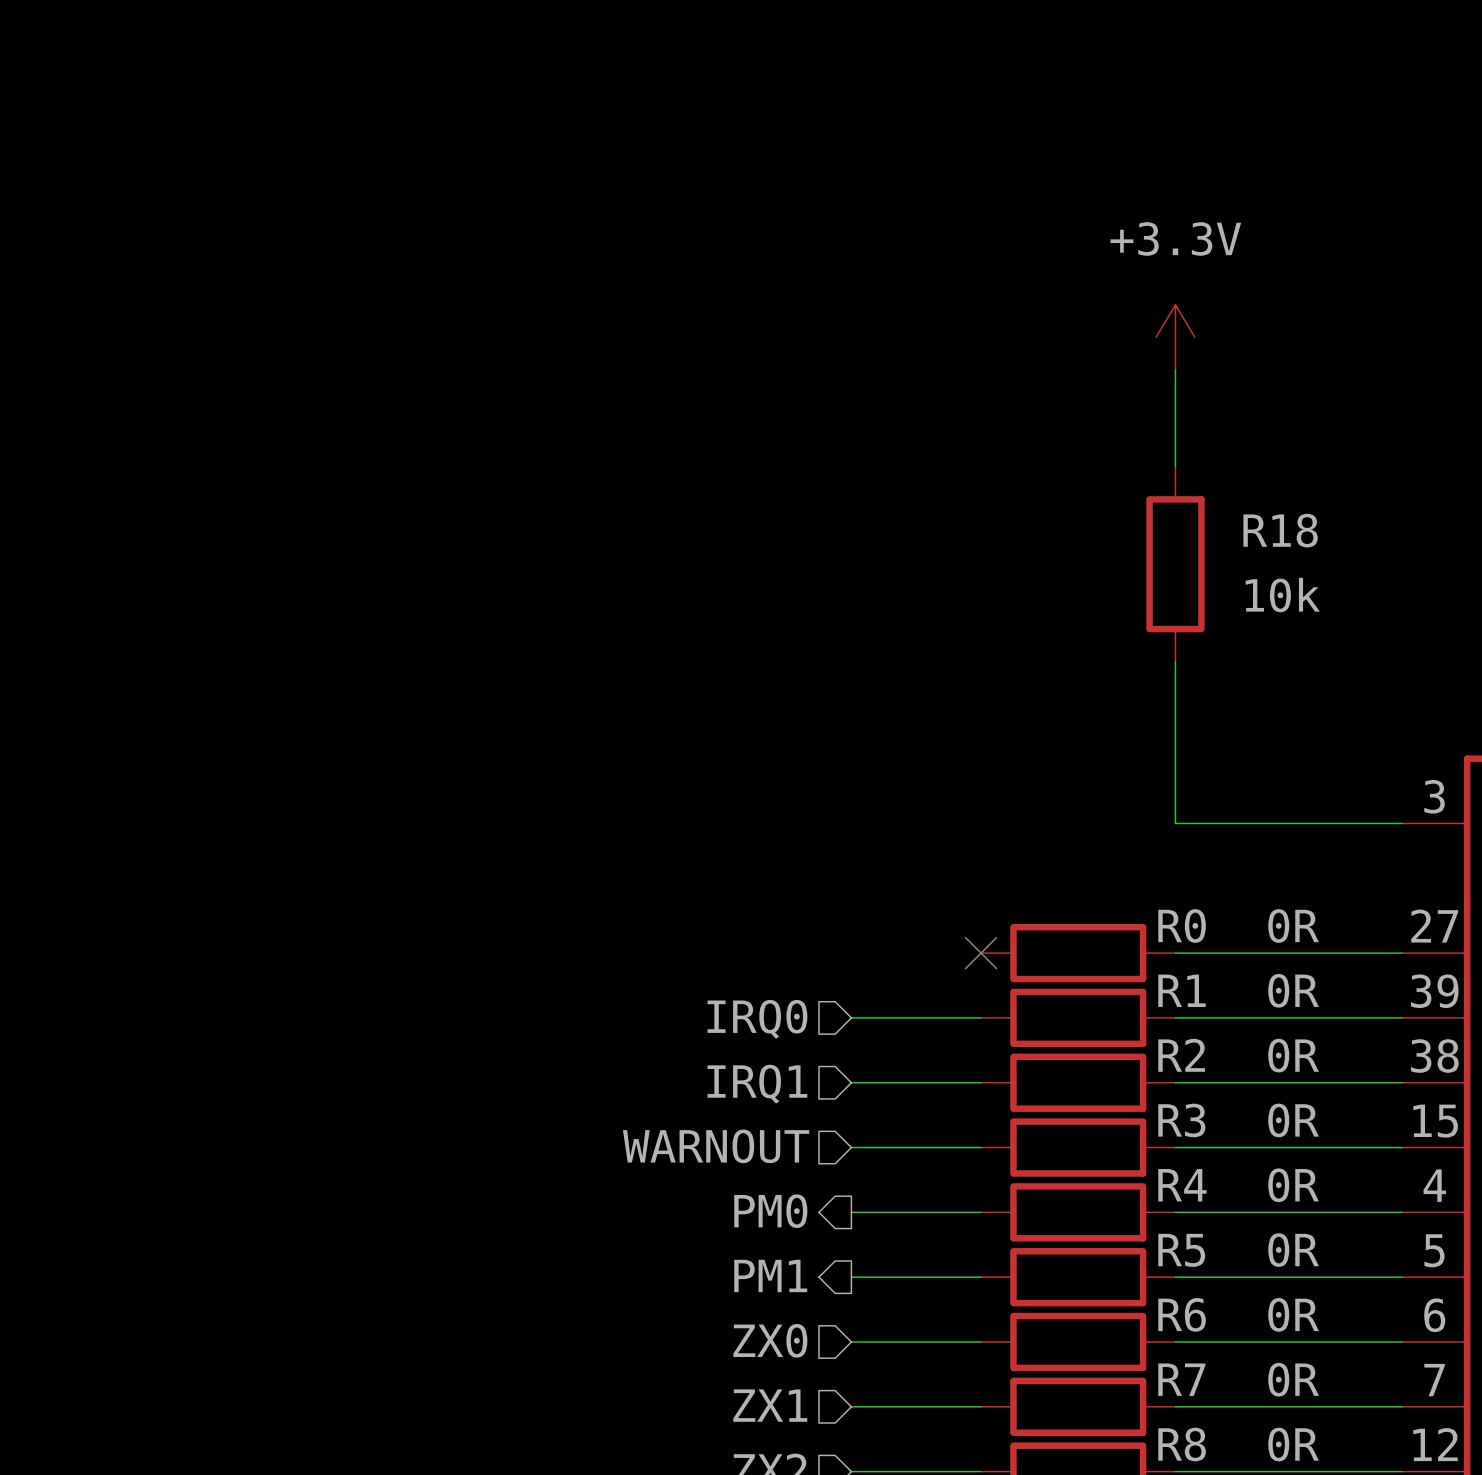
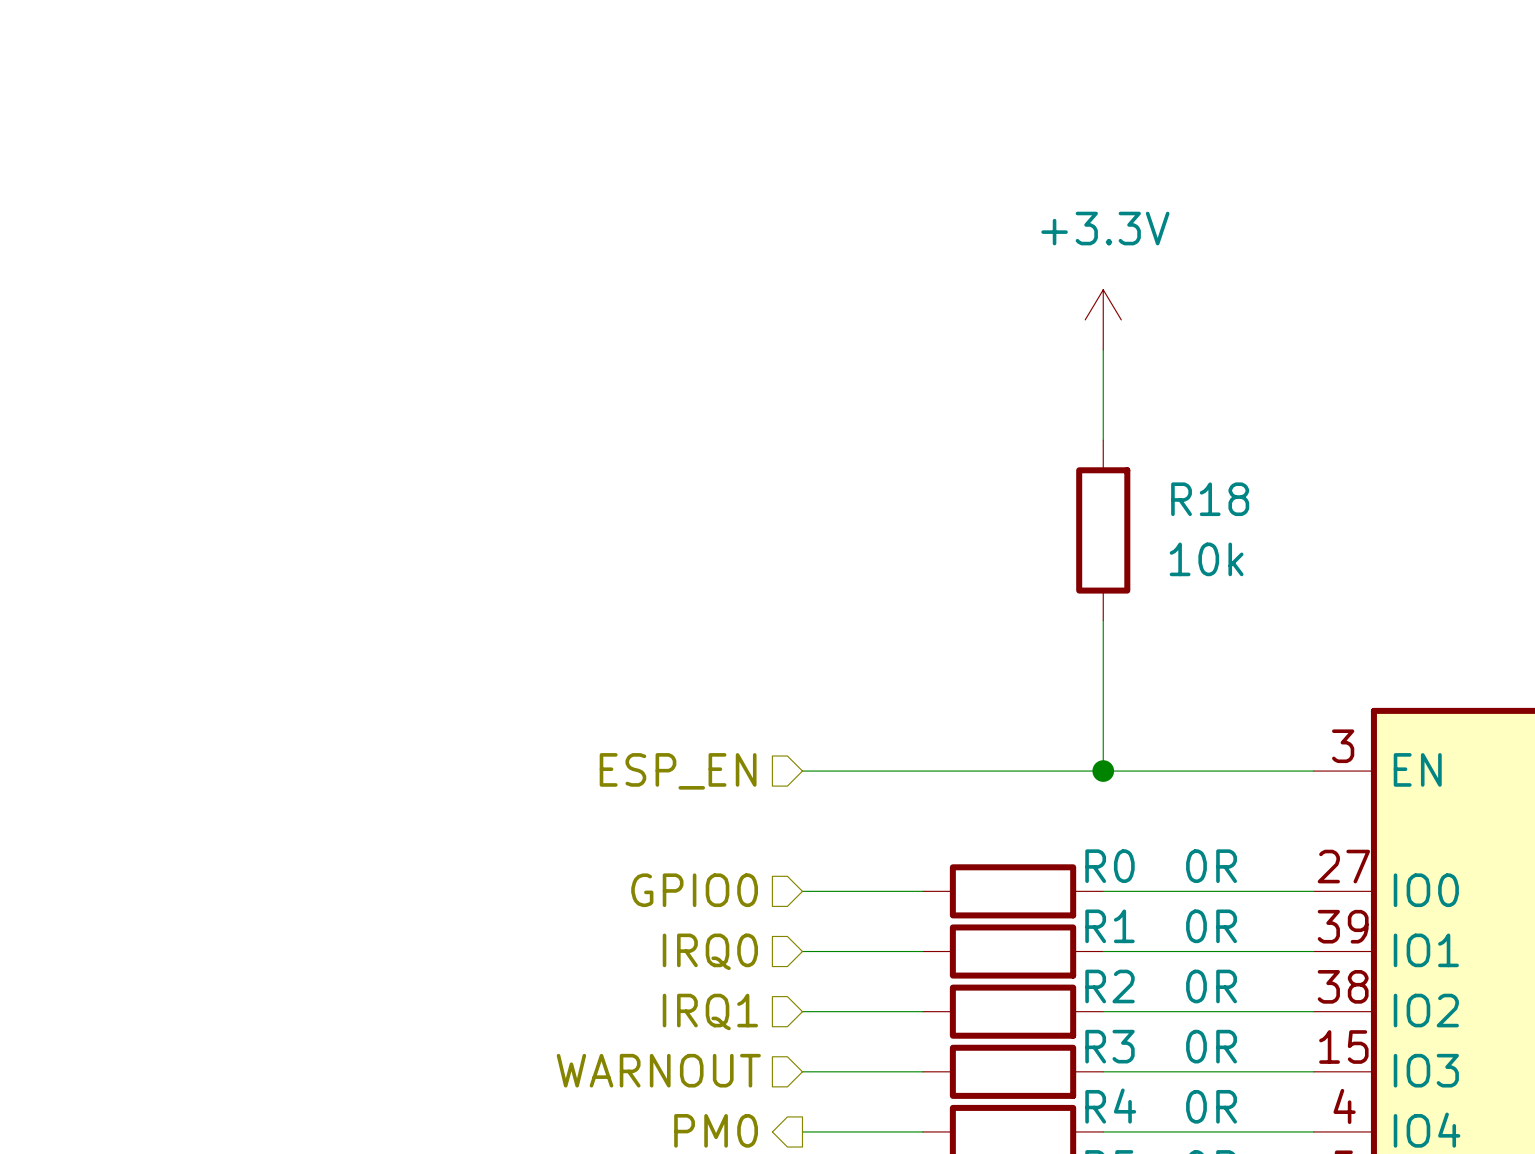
wire: none -> (802, 771) (1103, 771)
junction: none -> (1103, 771)
hierarchical label: none -> ESP_EN (678, 771)
hierarchical label: none -> GPIO0 (694, 890)
wire: none -> (802, 891) (922, 891)
no-connect mark: (981, 953) -> none

